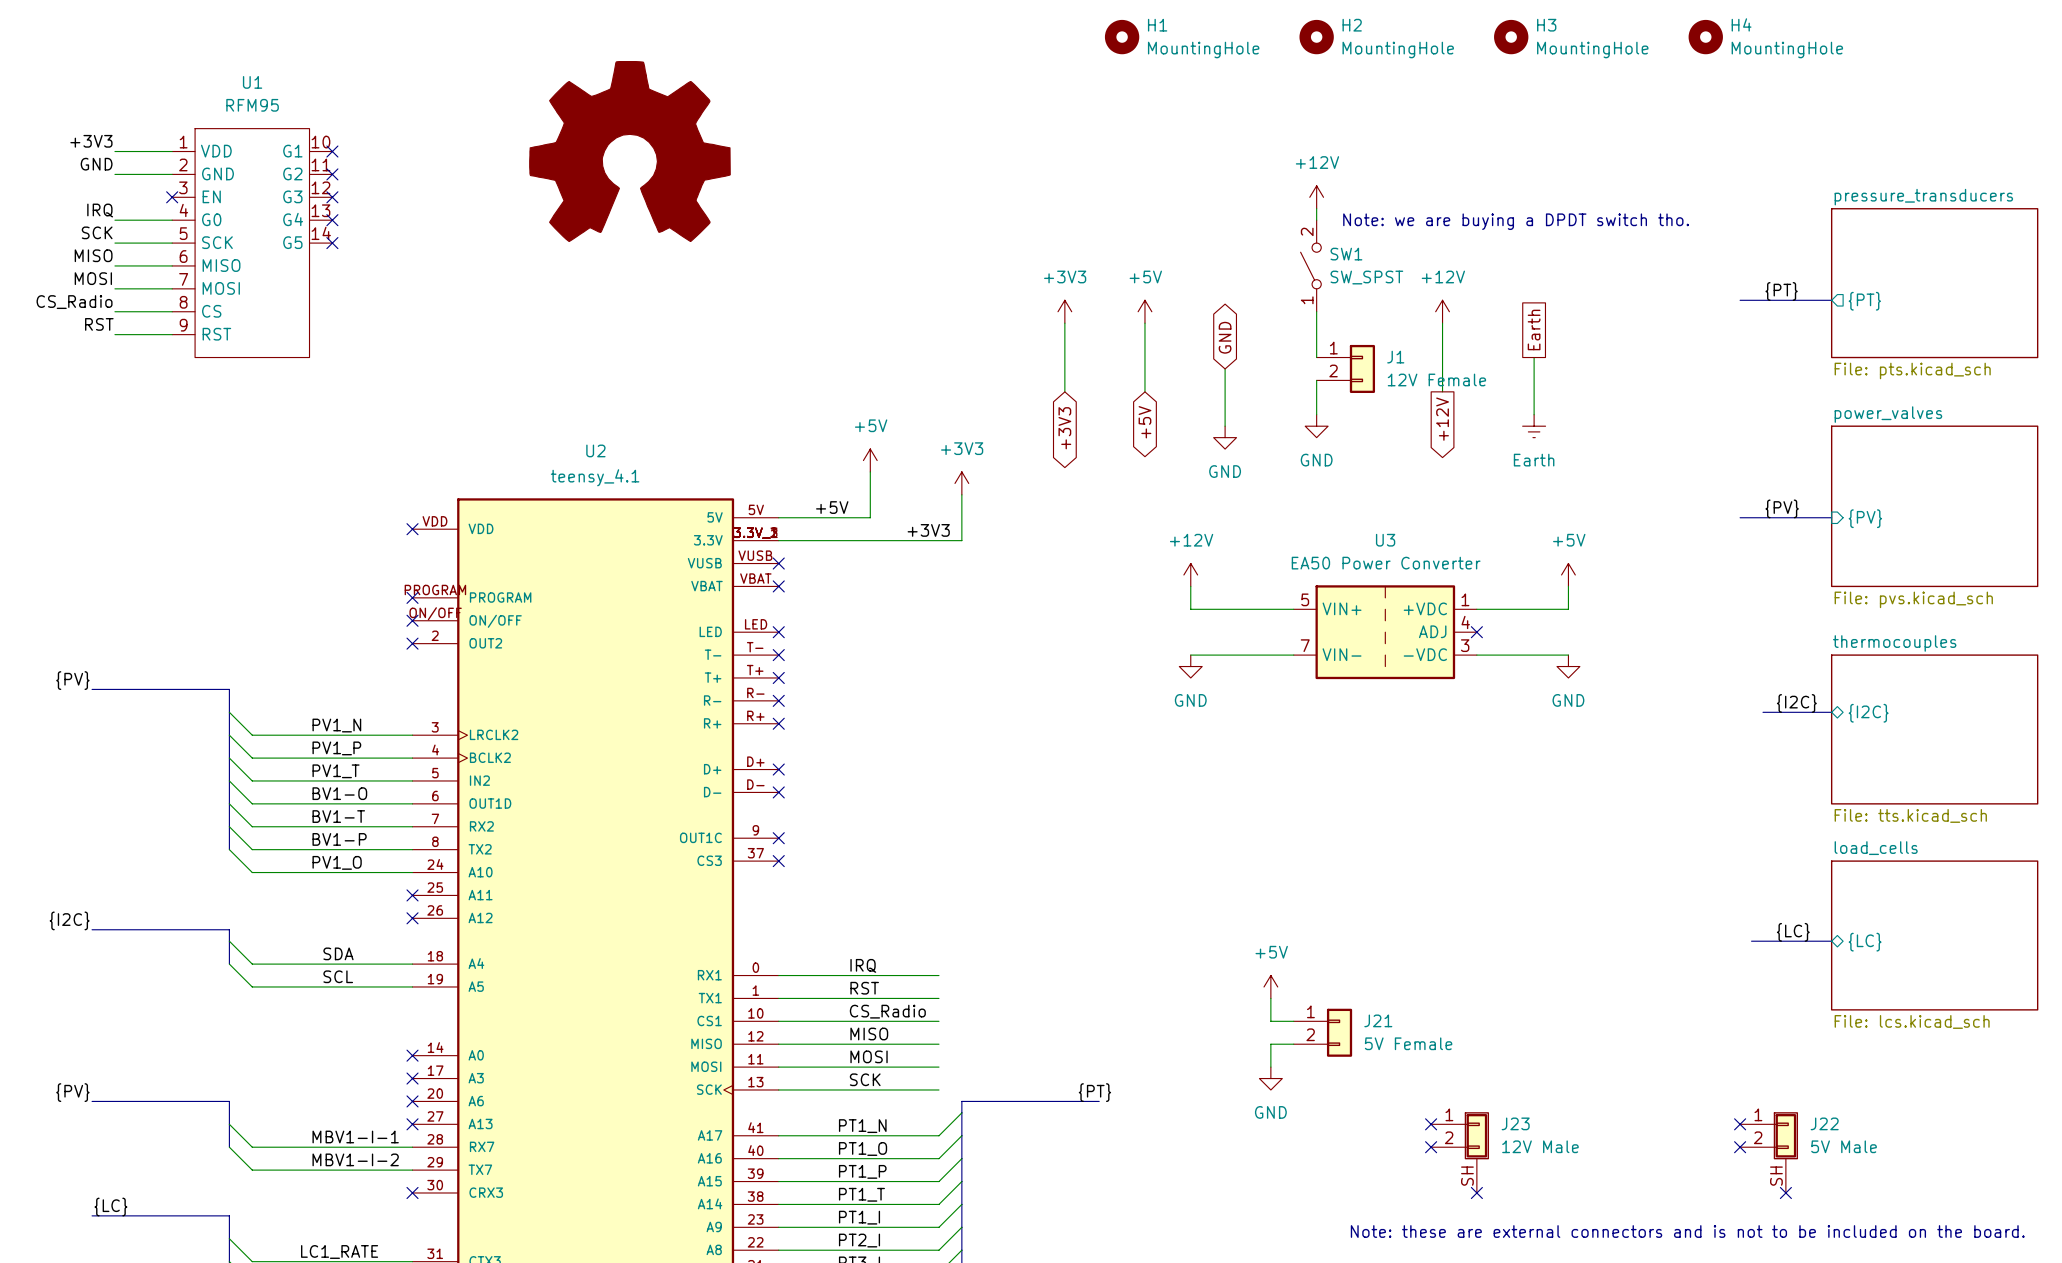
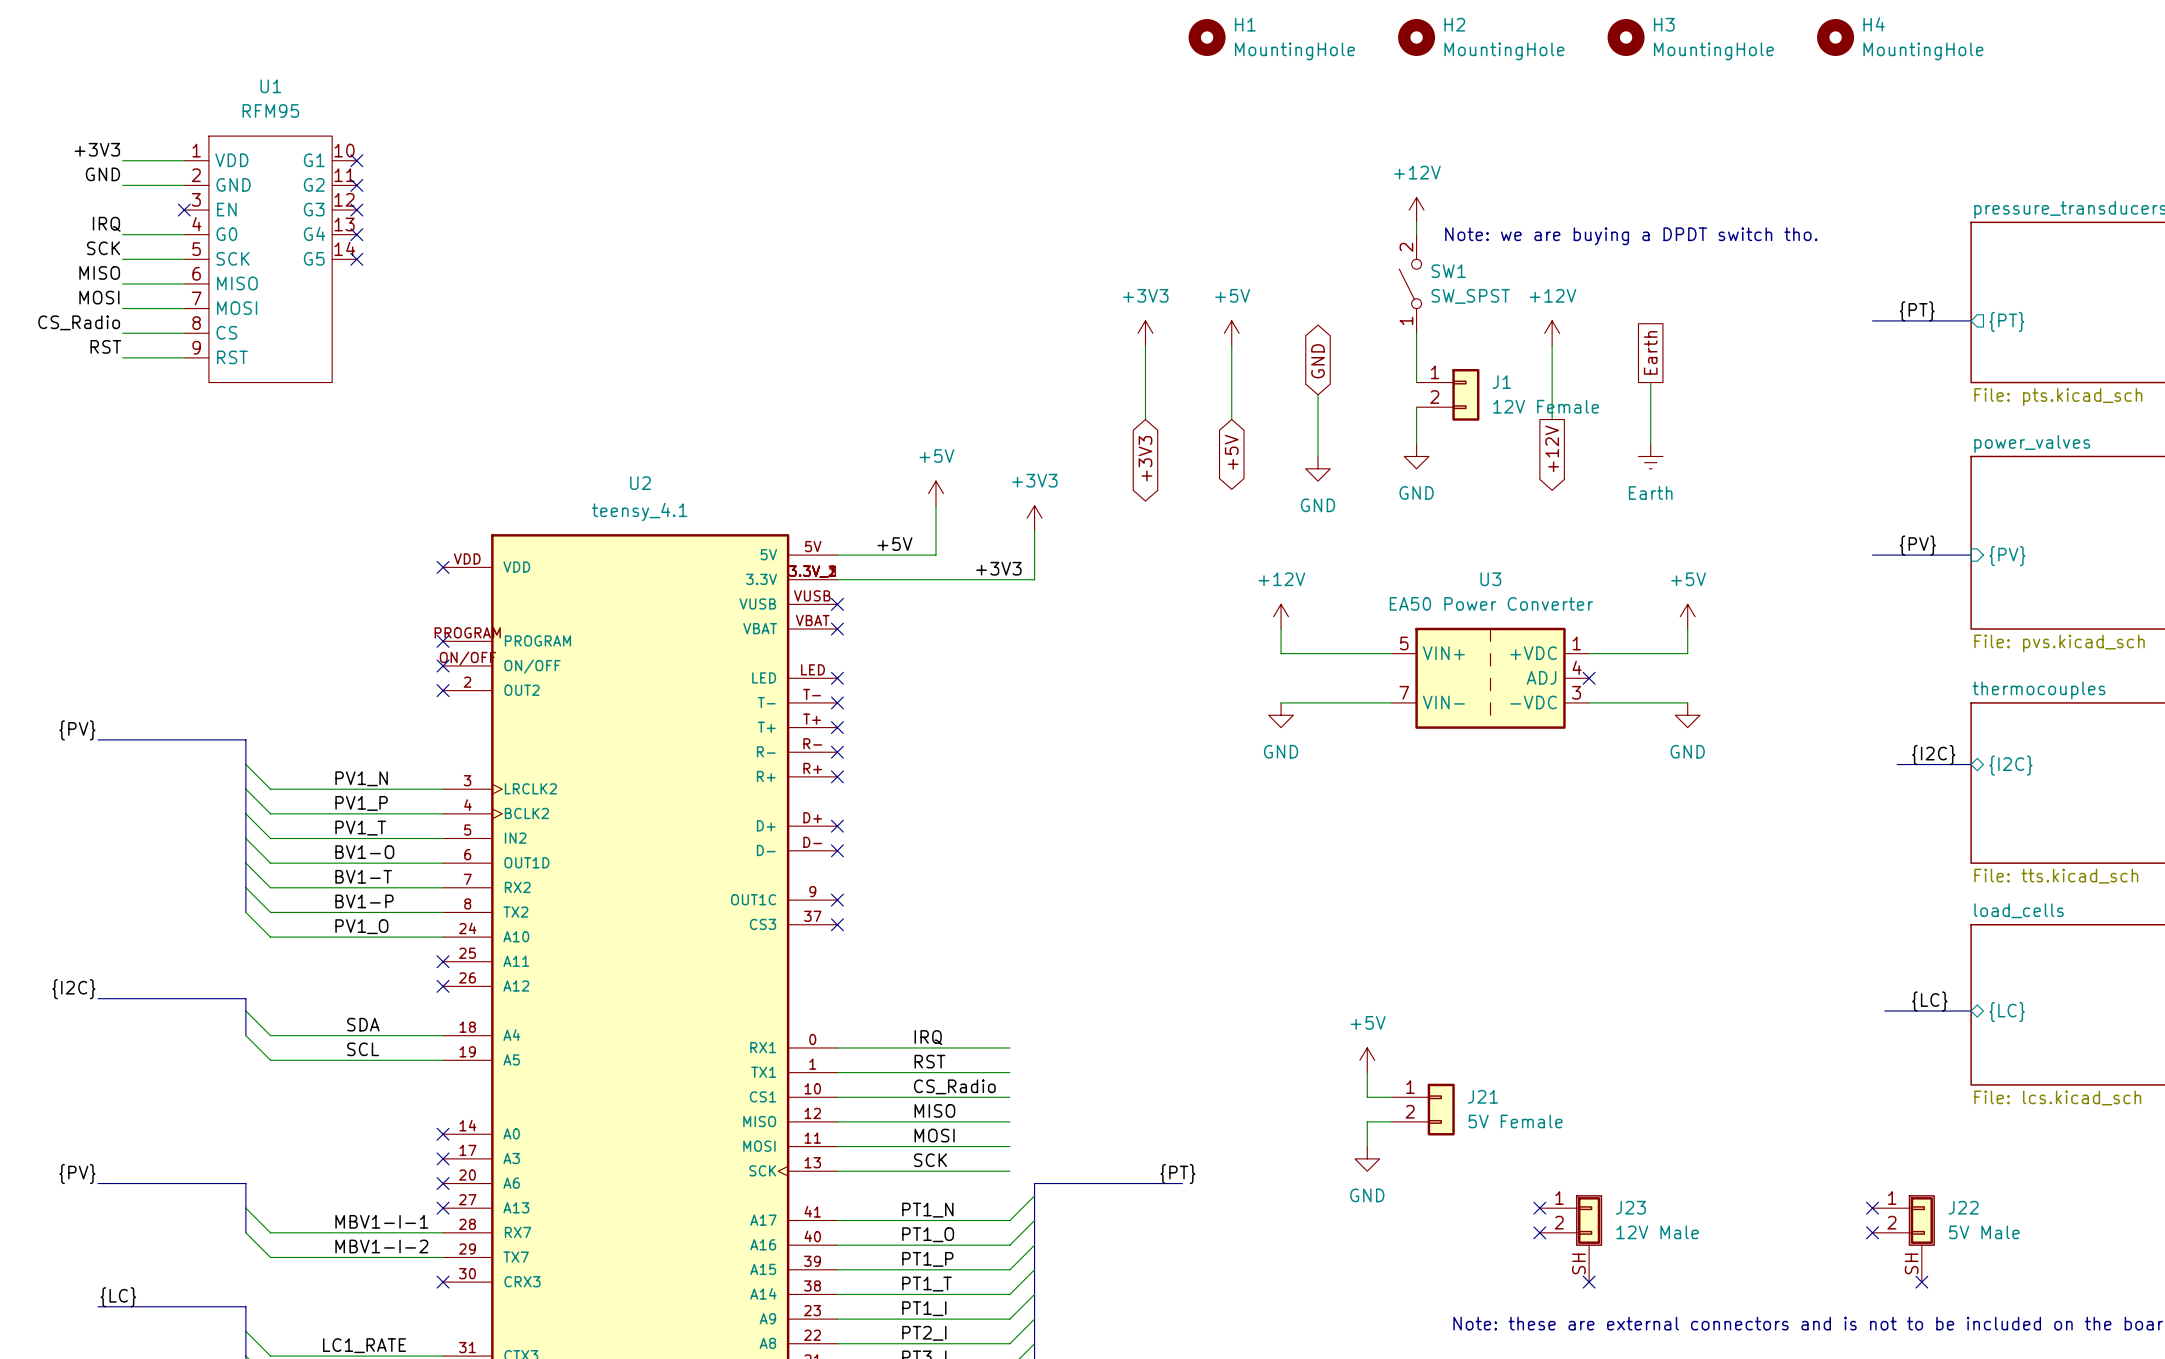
part: (629, 151) -> none

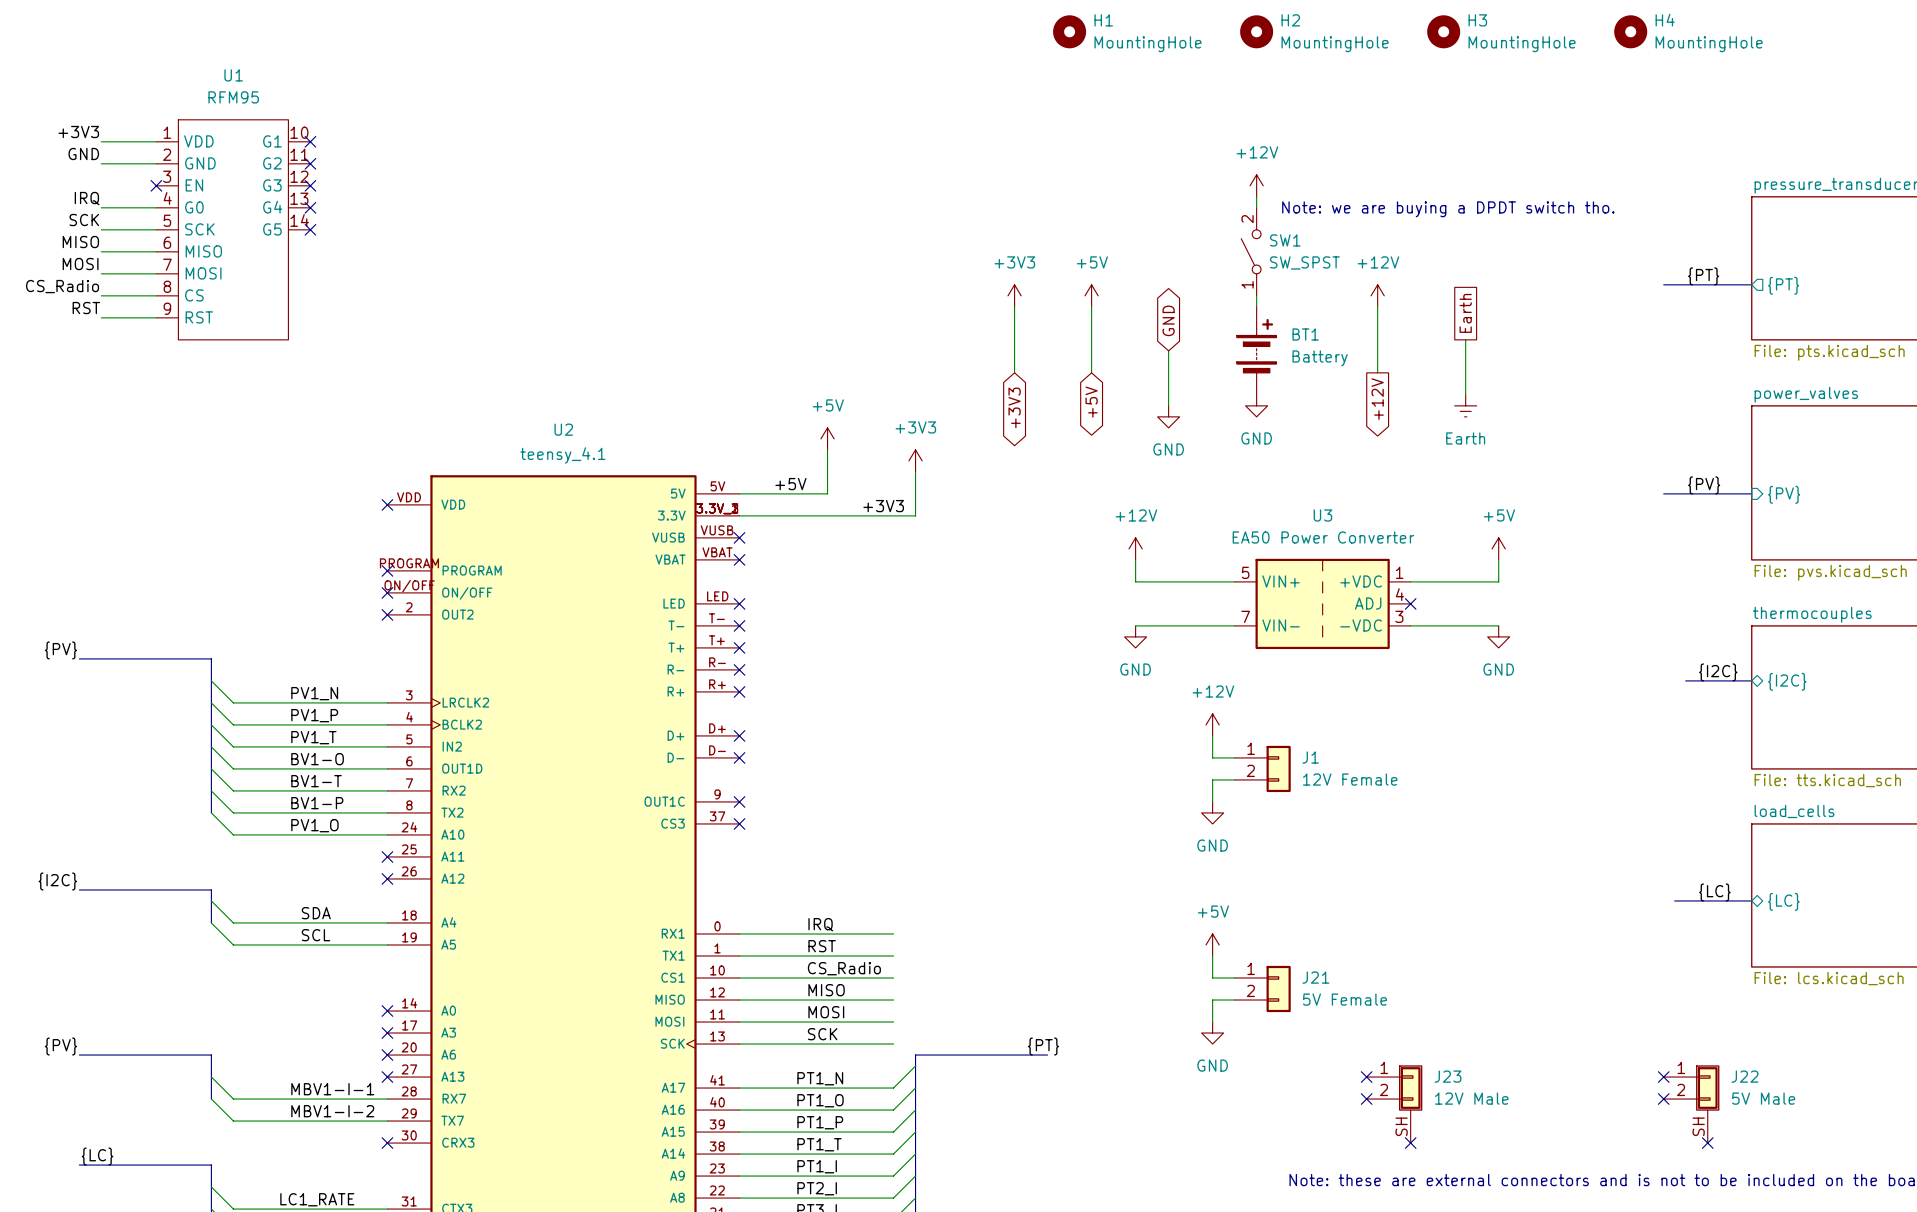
BT1: none -> Battery (1256, 350)
J1 position: (1448, 394) -> (1262, 768)
power symbol: none -> +12V (1212, 724)
wire: none -> (1212, 735) (1212, 757) (1234, 757)
wire: none -> (1234, 779) (1212, 779) (1212, 801)
power symbol: none -> GND (1212, 812)

